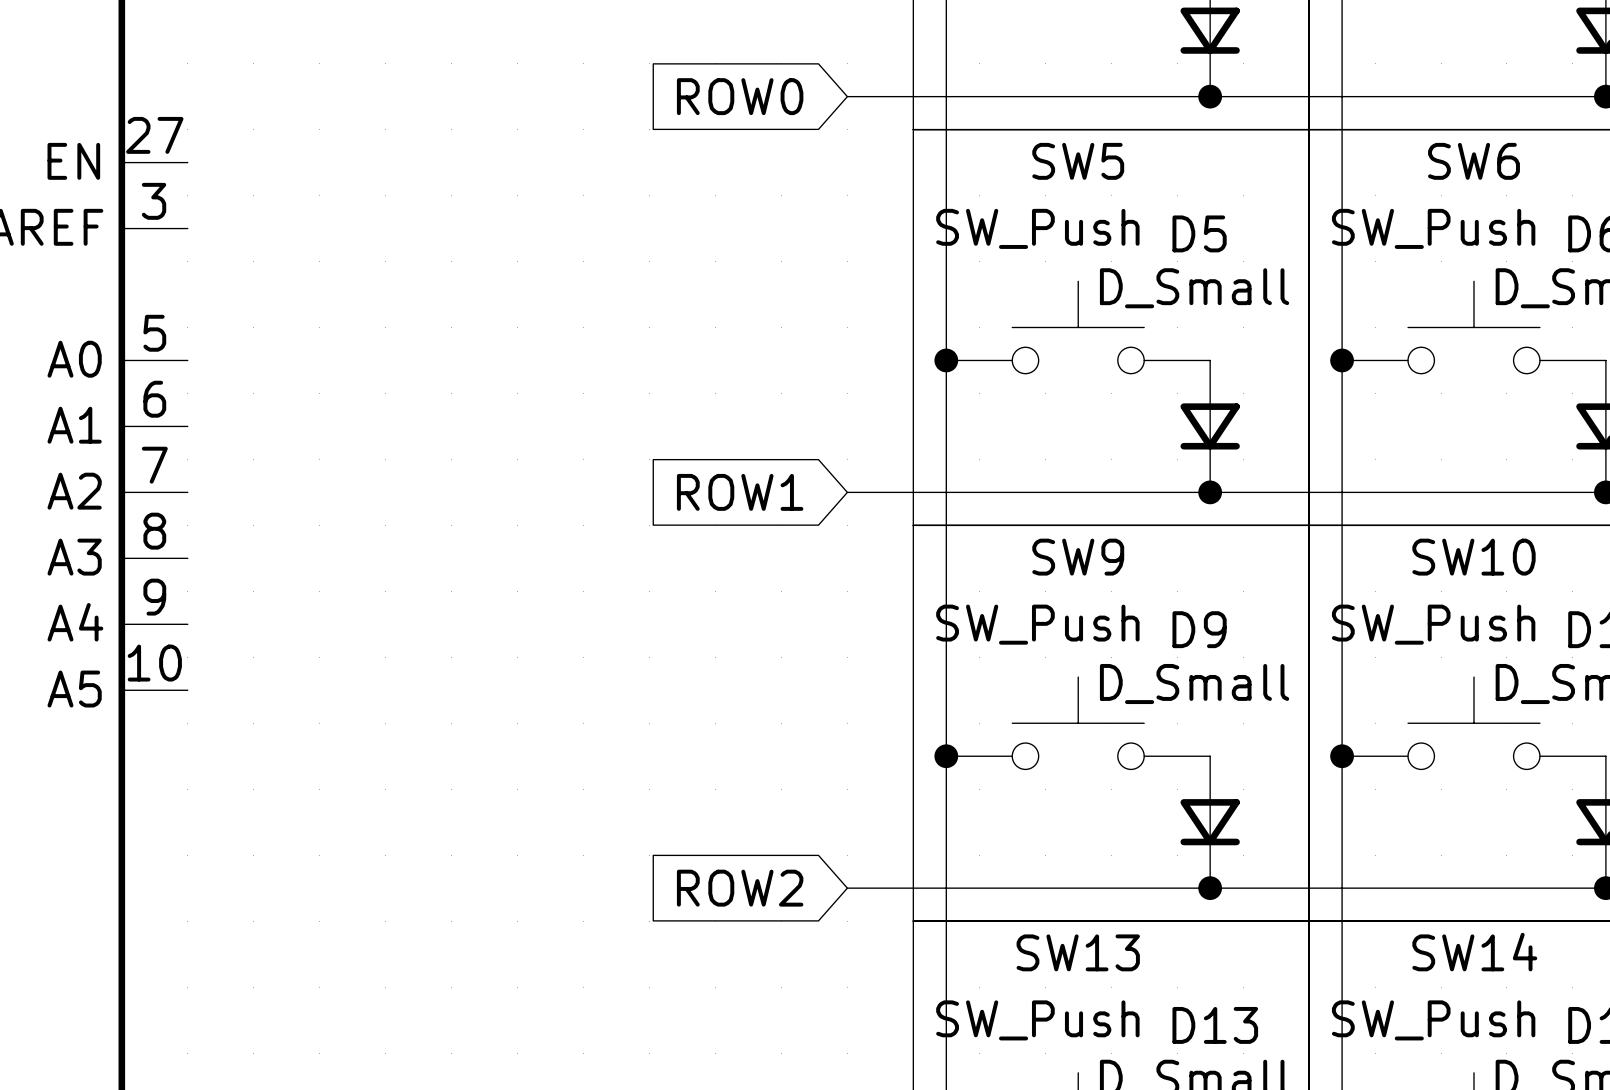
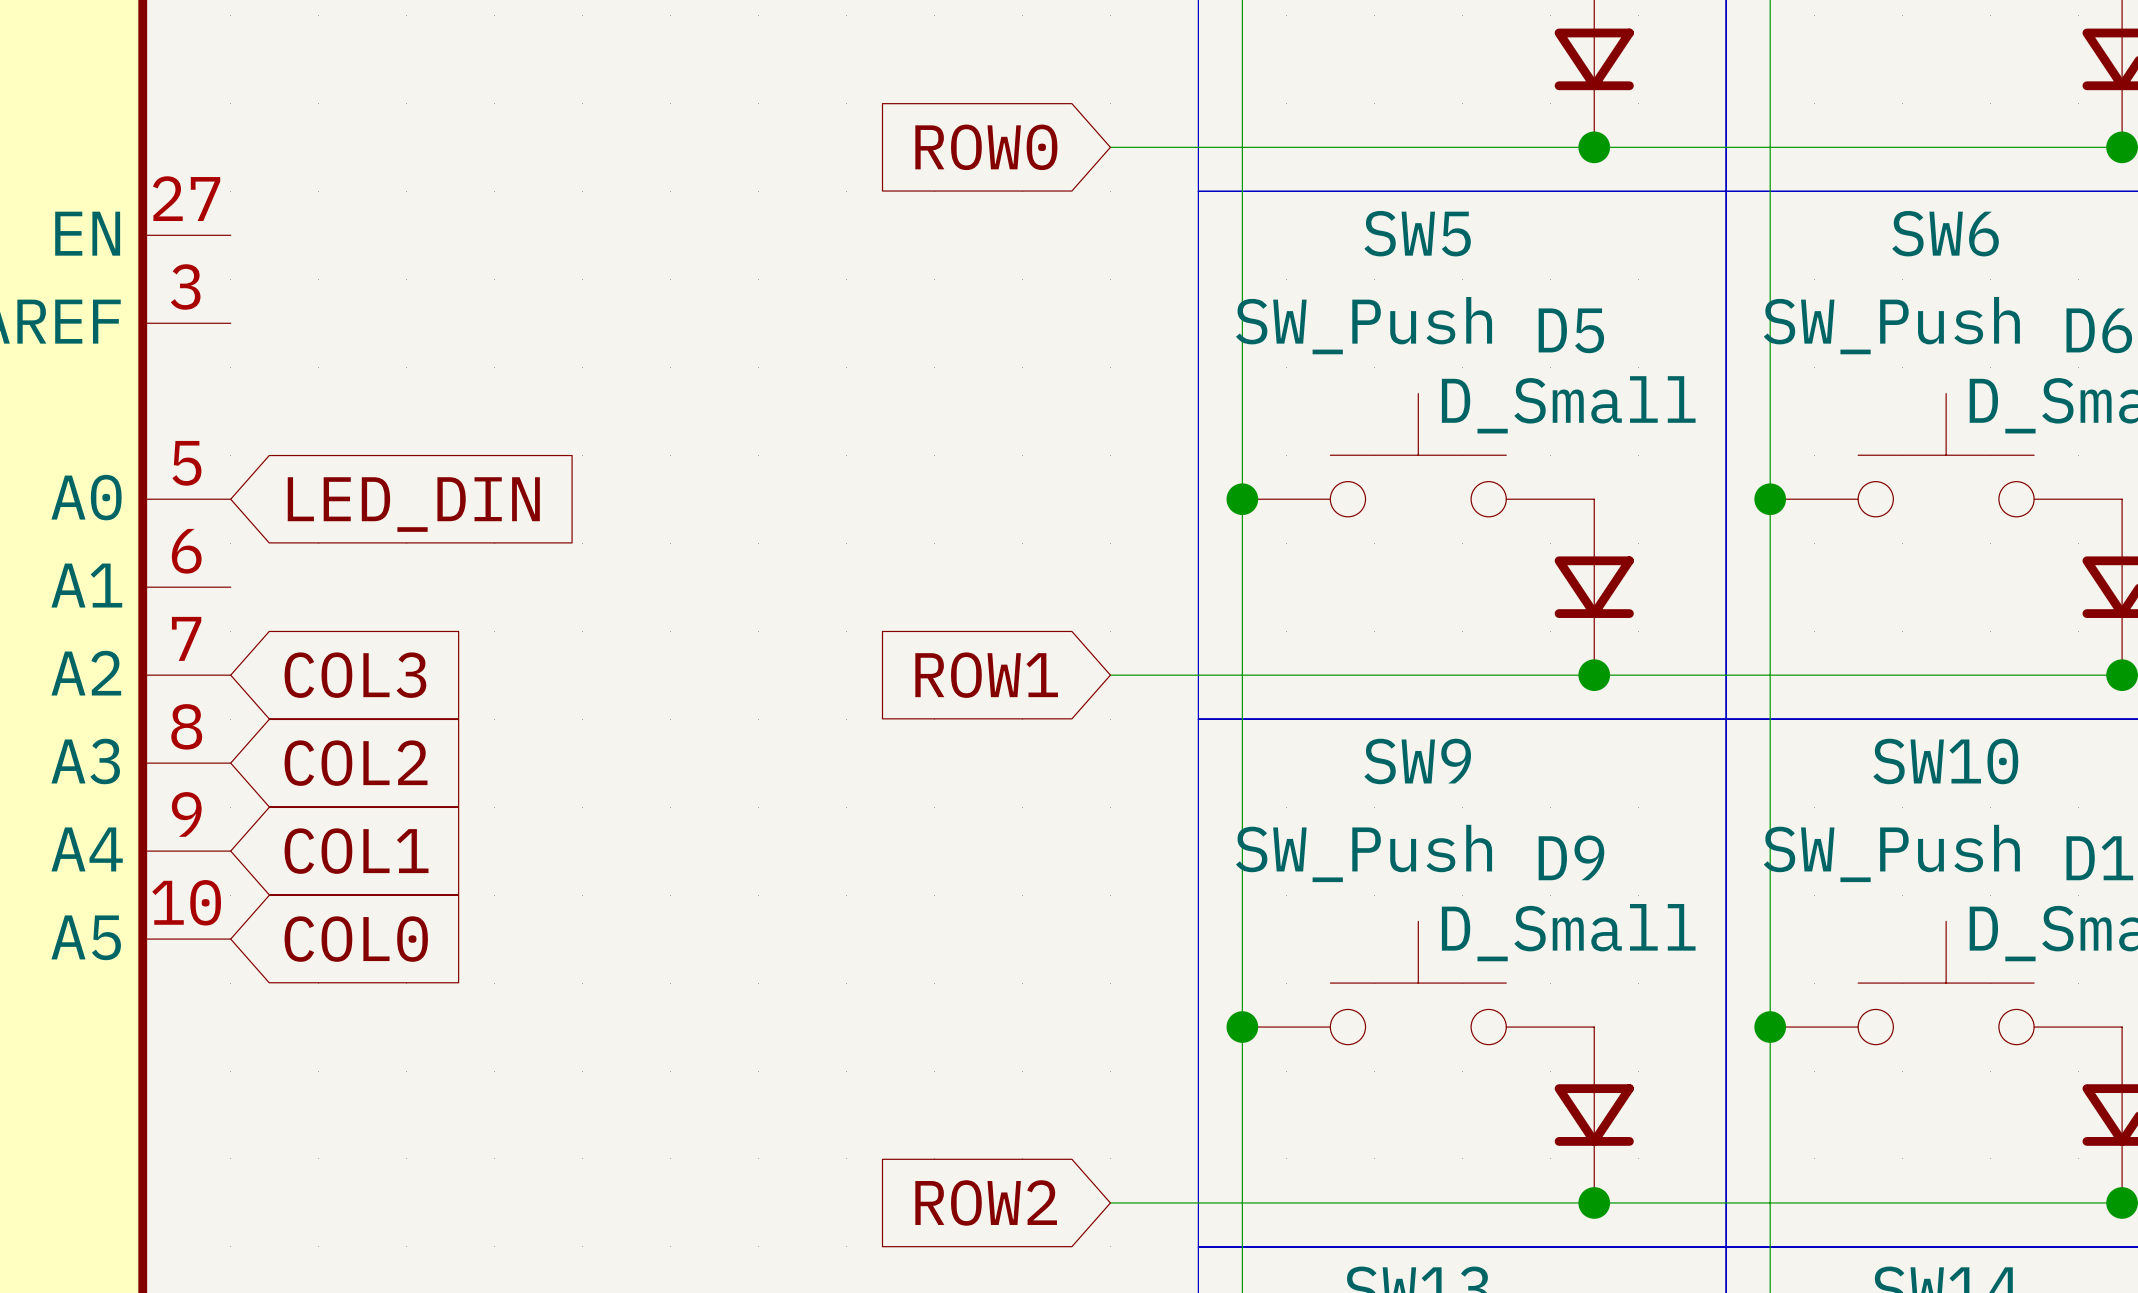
global label: none -> LED_DIN (413, 504)
global label: none -> COL3 (355, 675)
global label: none -> COL2 (356, 763)
global label: none -> COL1 (356, 851)
global label: none -> COL0 (356, 939)

